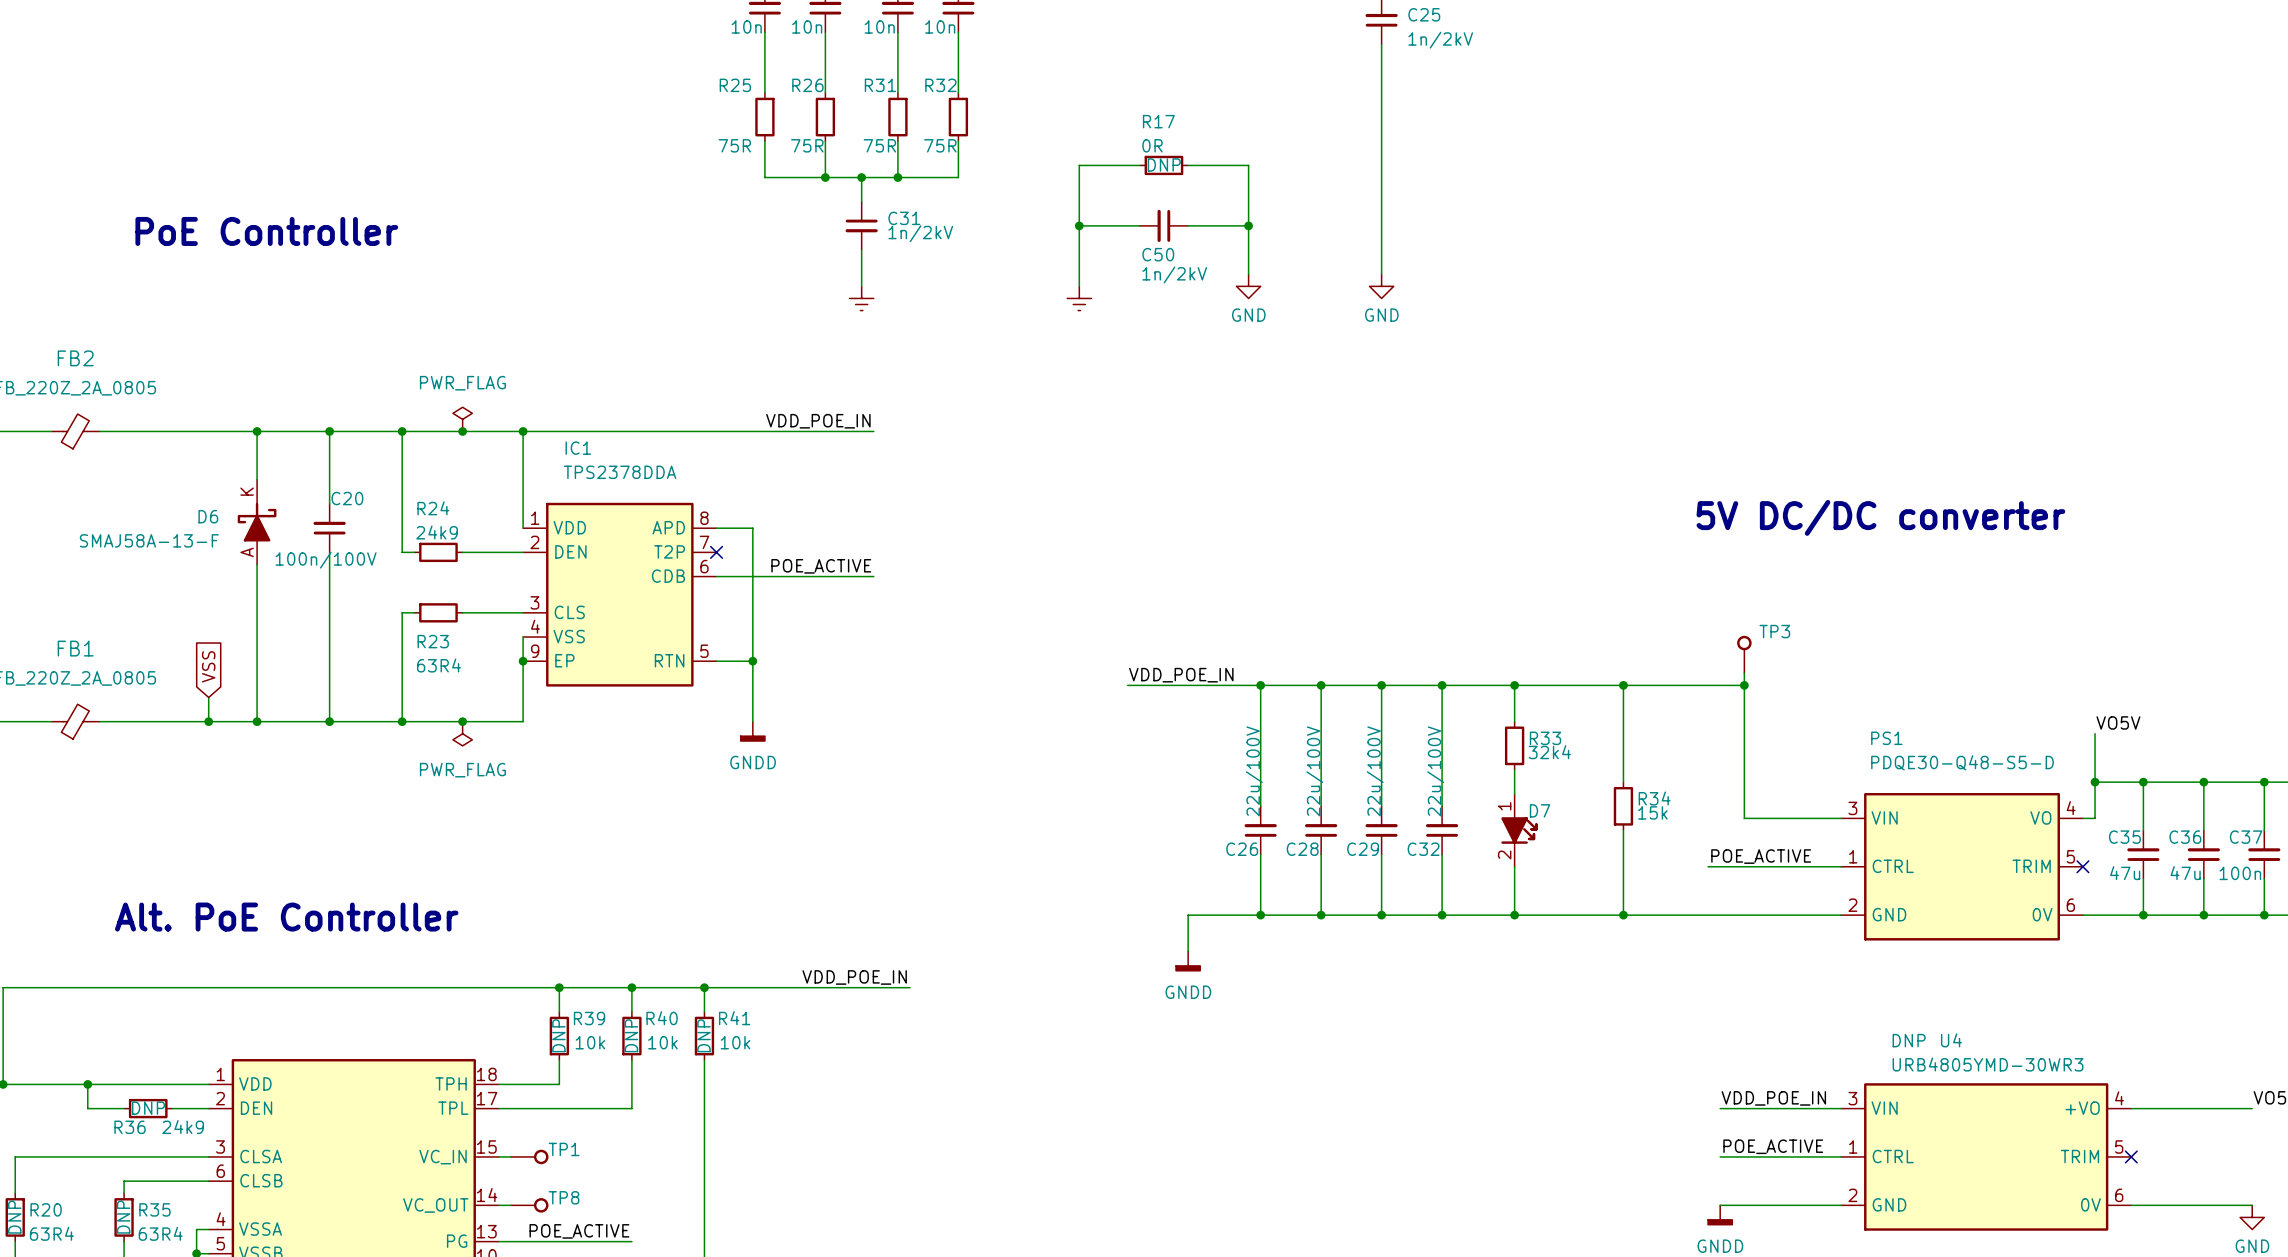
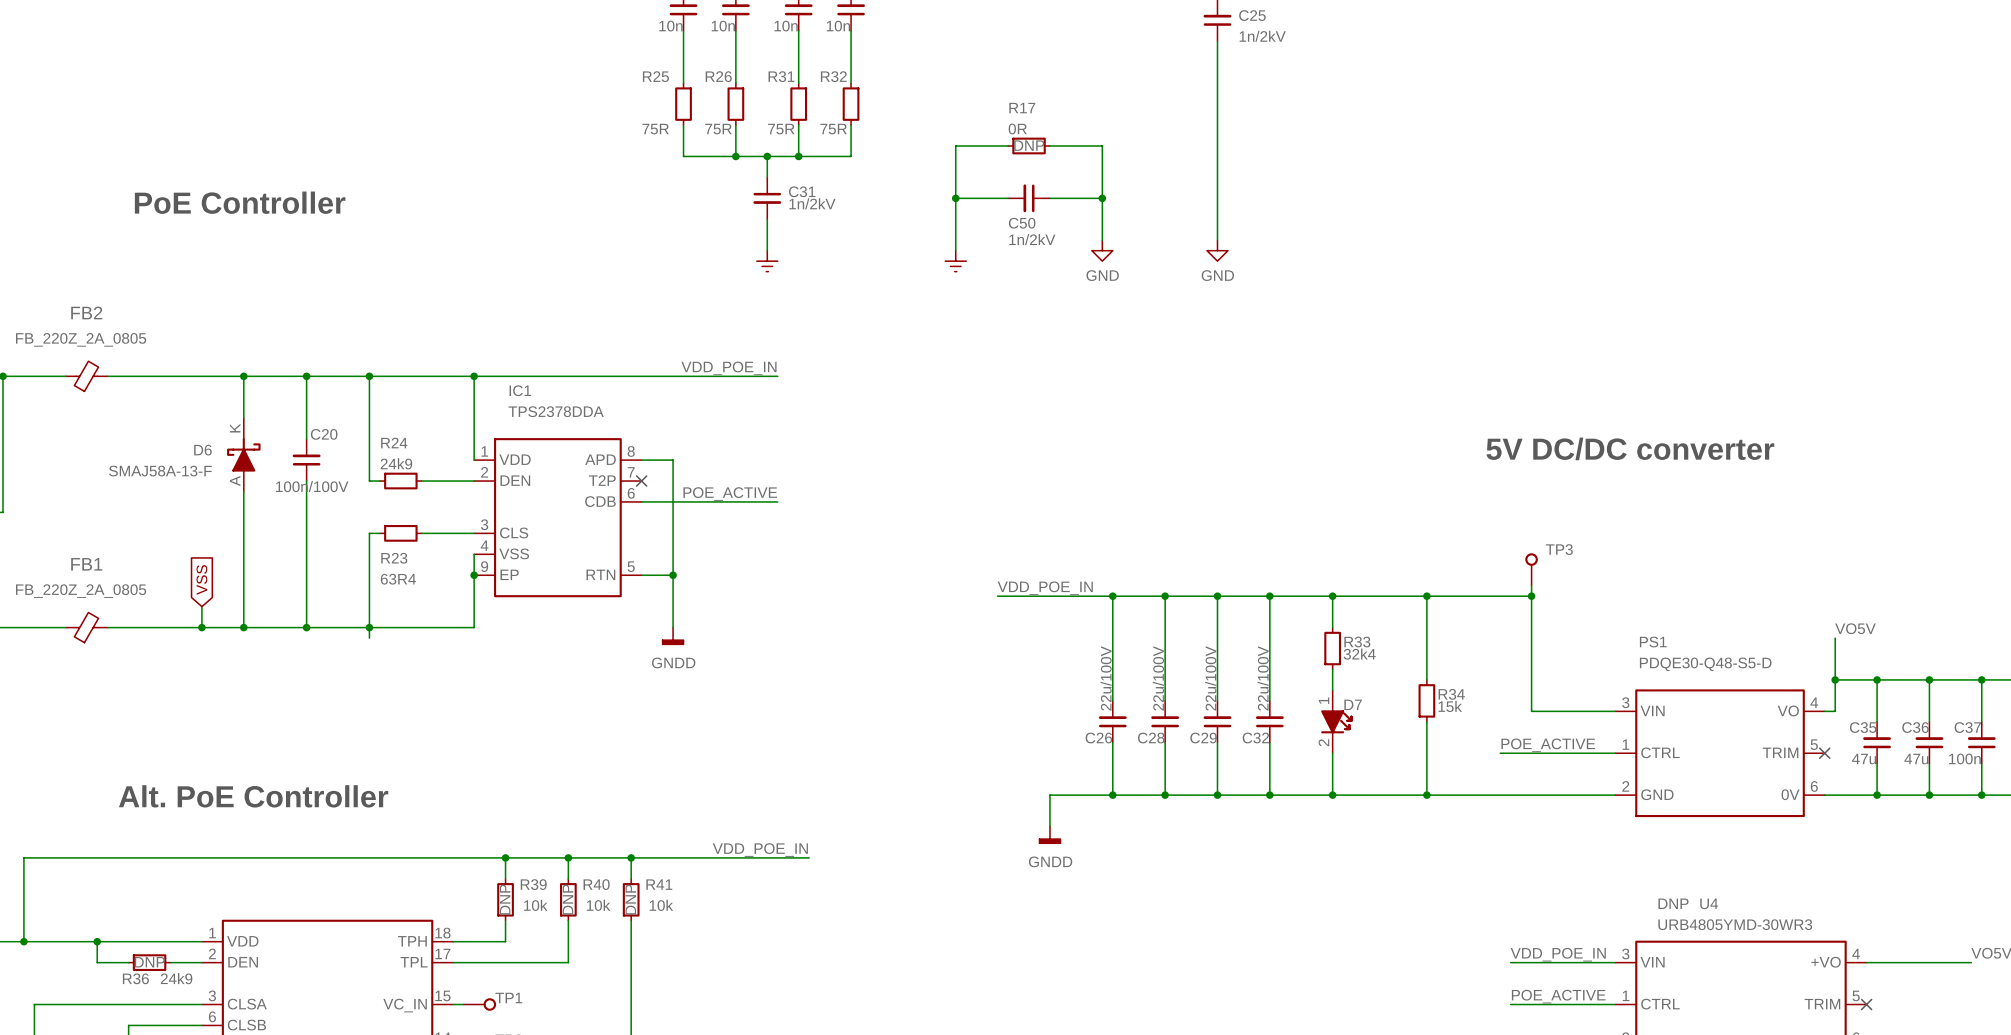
power symbol: PWR_FLAG (462, 419) -> none
junction: (462, 431) -> none
wire: none -> (369, 627) (369, 638)
junction: (462, 721) -> none
power symbol: PWR_FLAG (462, 733) -> none

